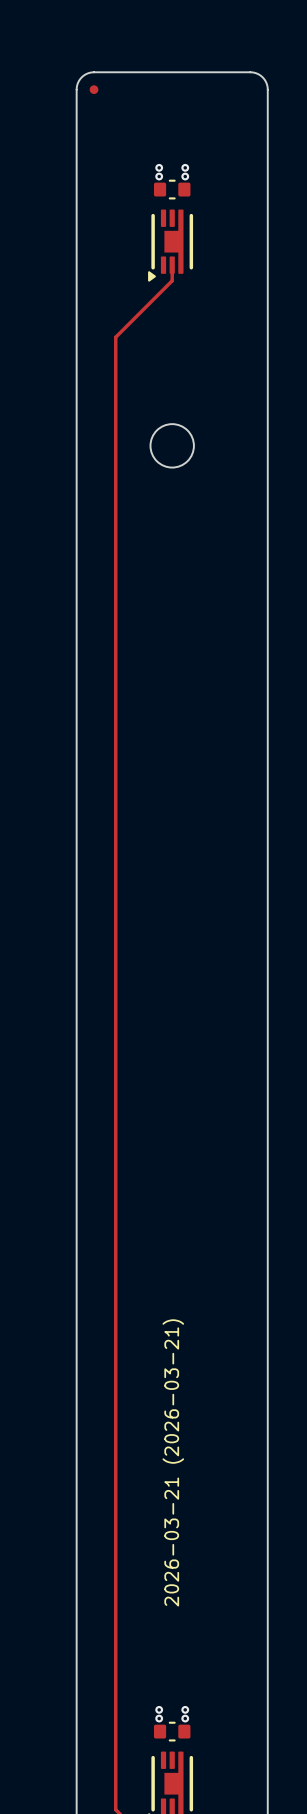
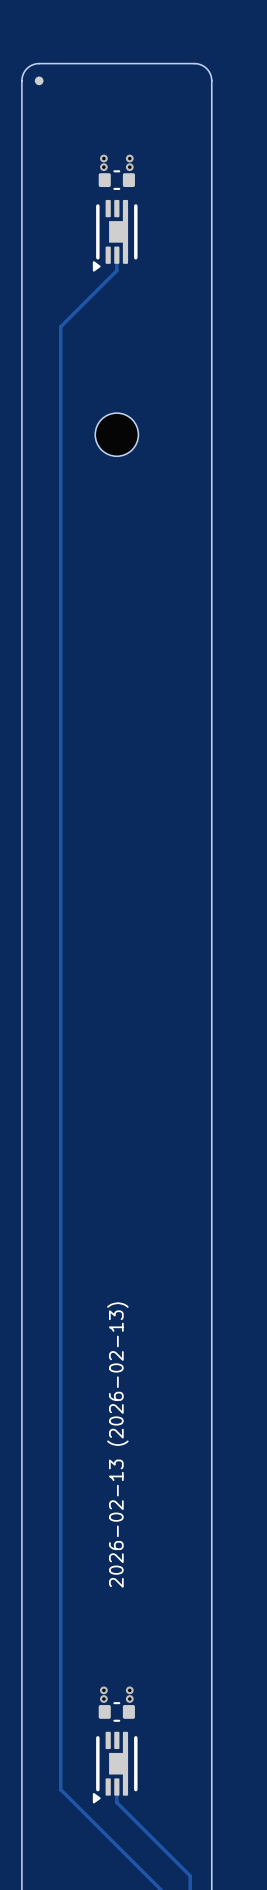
drawing shape: [162, 1319, 185, 1607] -> [107, 1302, 129, 1588]

